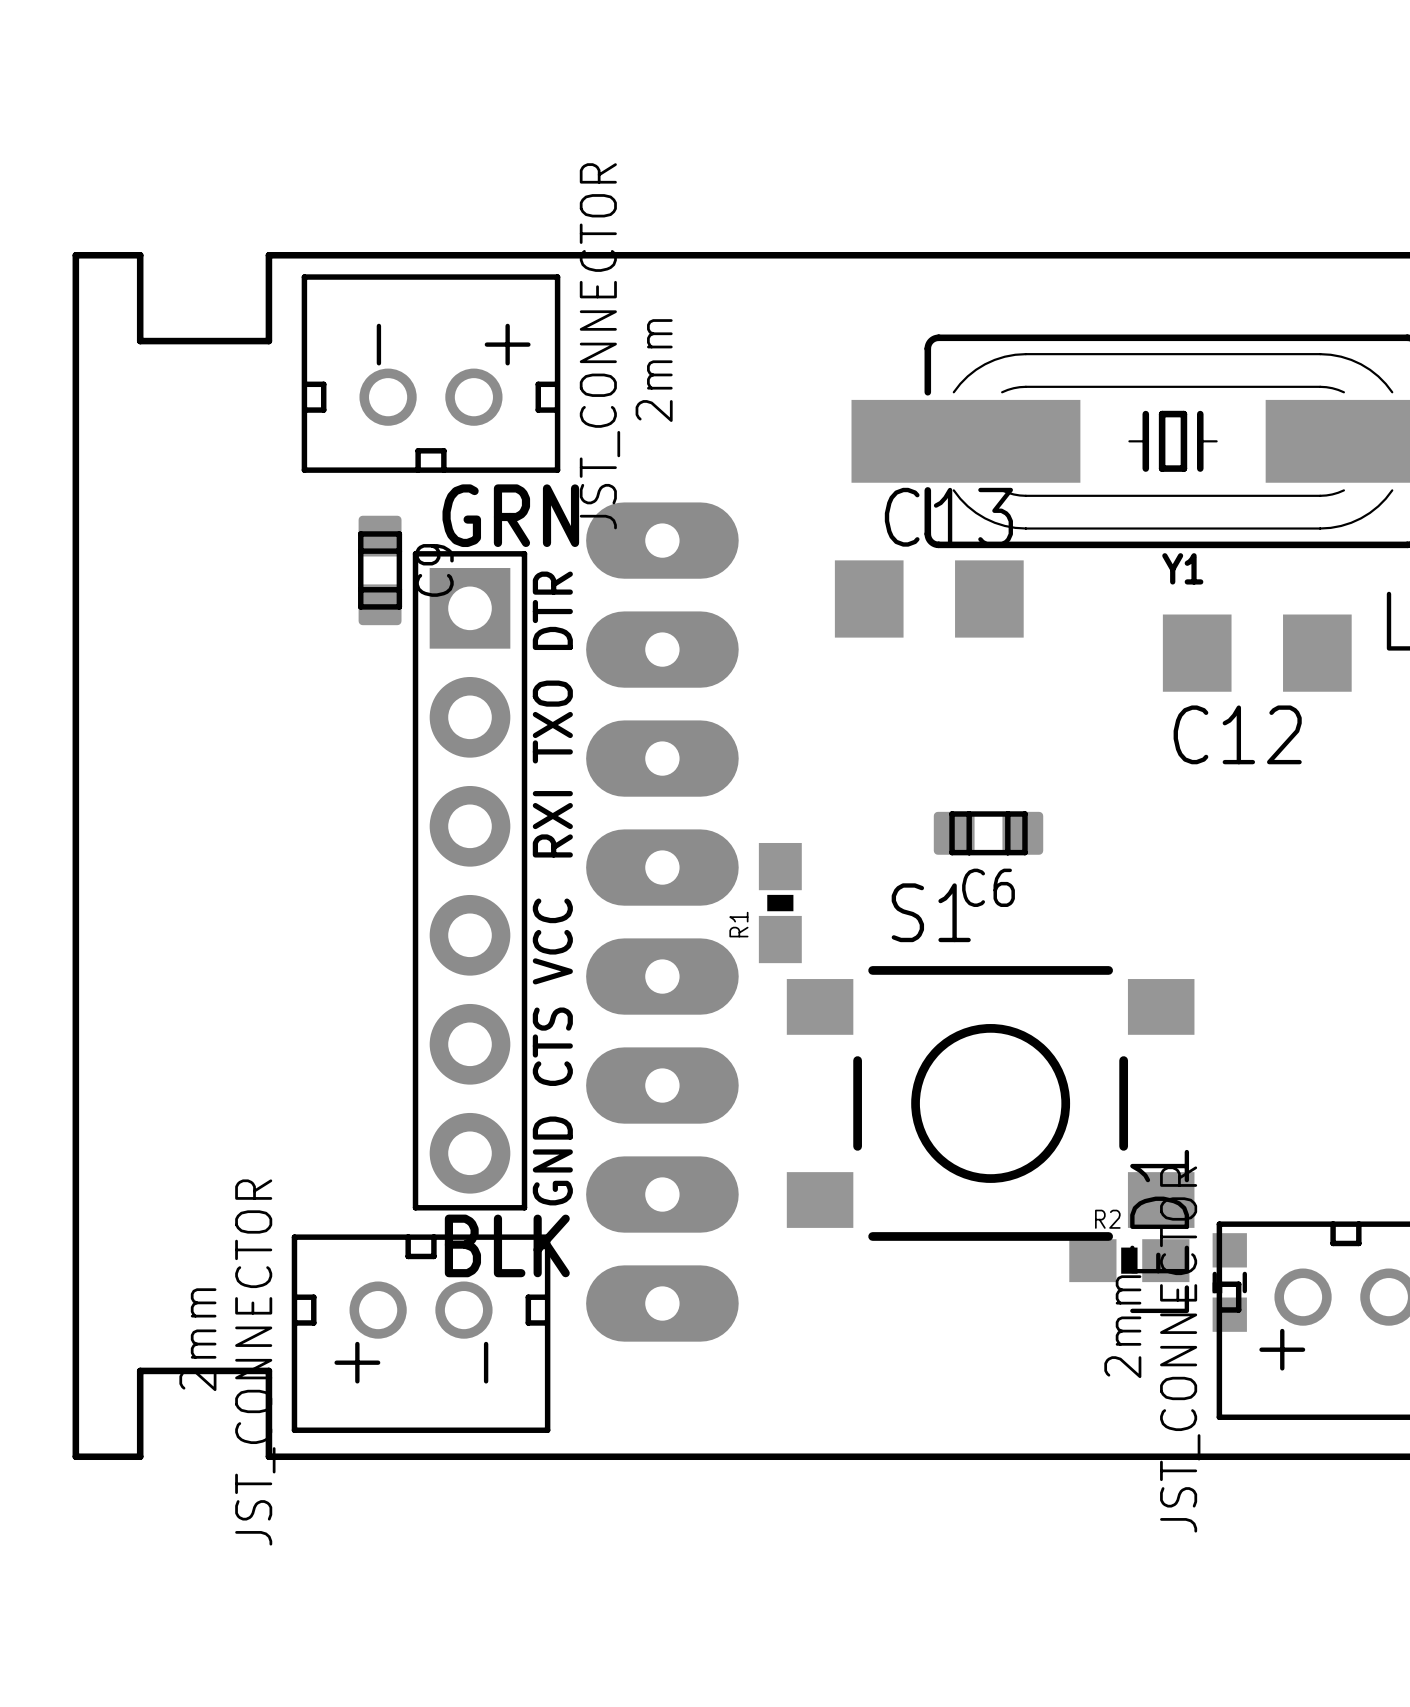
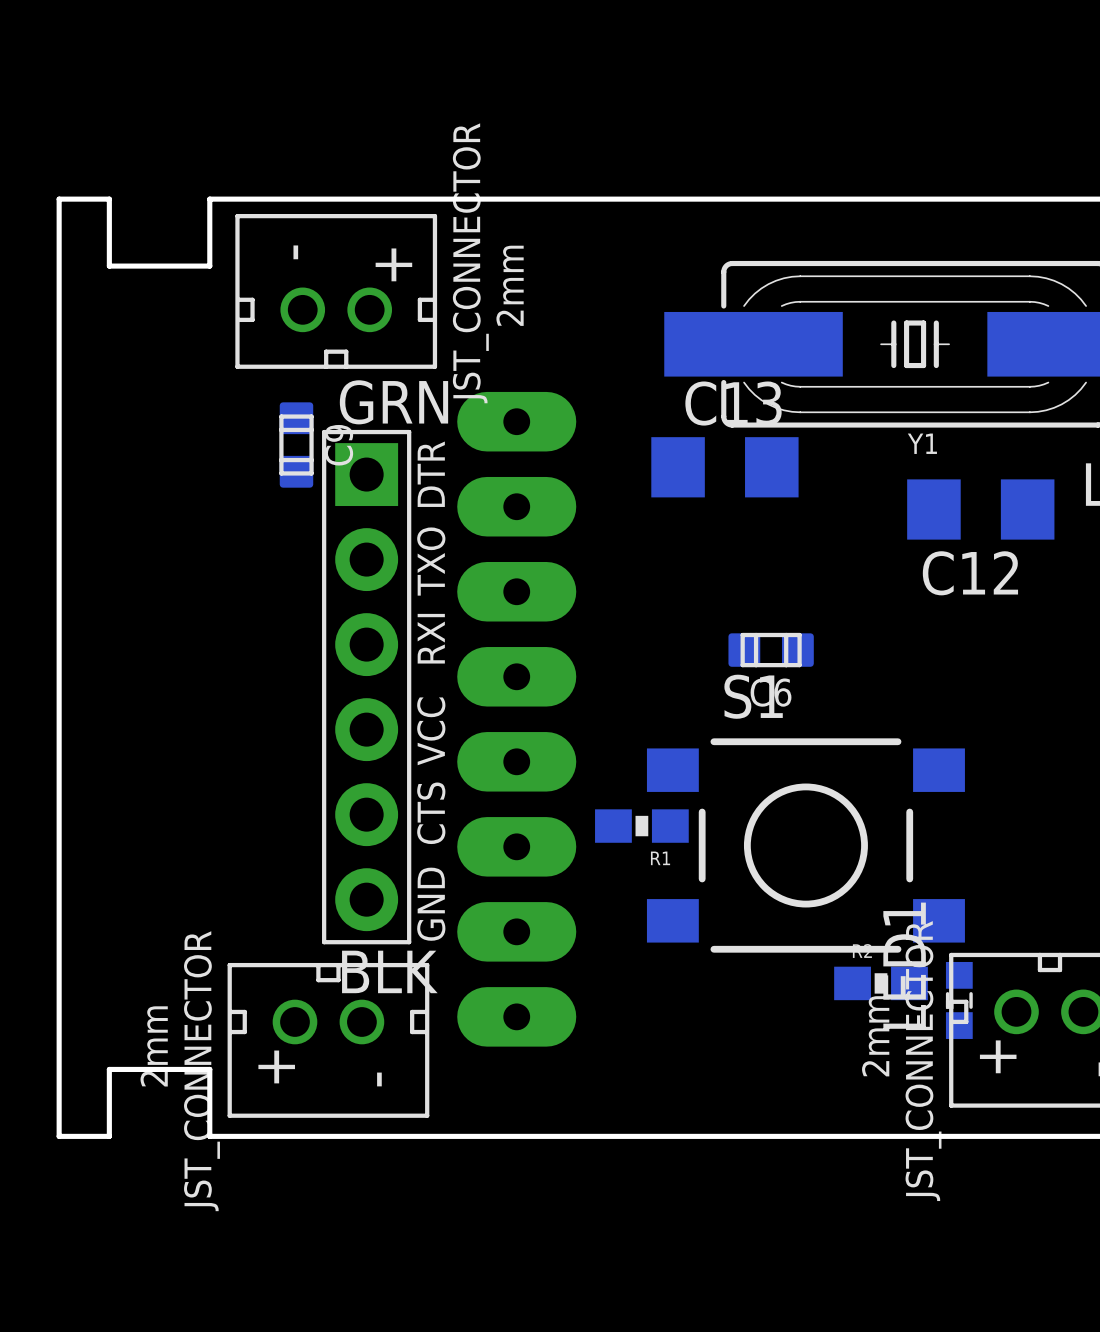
R1 rotation: 0° (780, 903) -> 90° clockwise (641, 826)
R1 position: (780, 903) -> (641, 826)
S1 position: (990, 1103) -> (805, 845)

